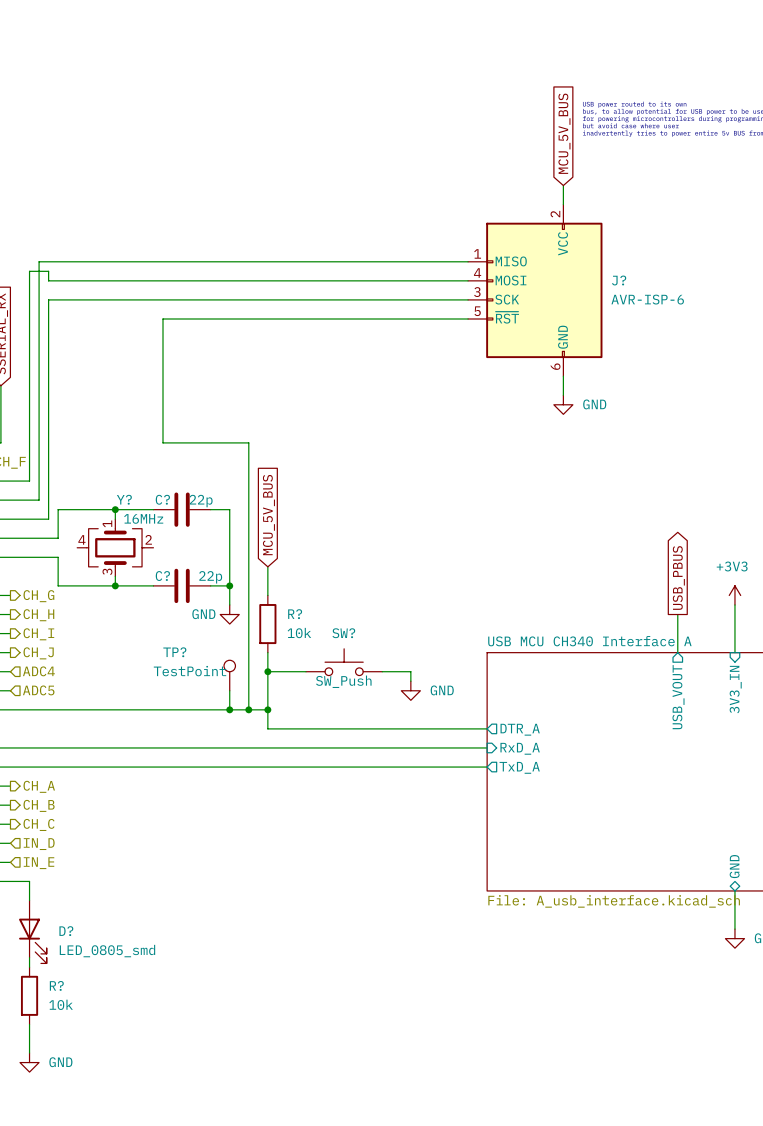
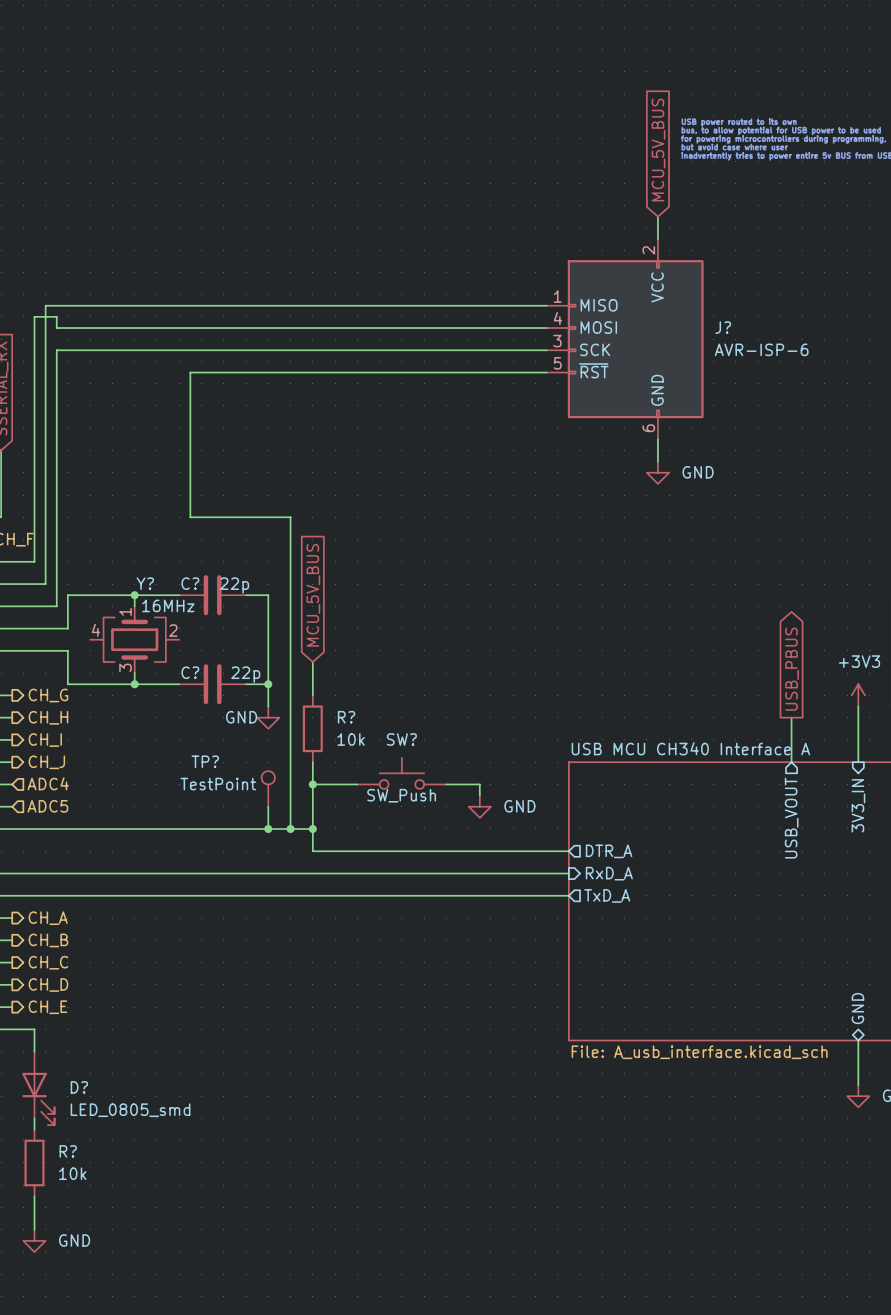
hierarchical label shape: input (39, 844) -> output (48, 984)
hierarchical label: IN_D (39, 844) -> CH_D (48, 984)
hierarchical label shape: input (38, 863) -> output (47, 1007)
hierarchical label: IN_E (38, 863) -> CH_E (47, 1007)

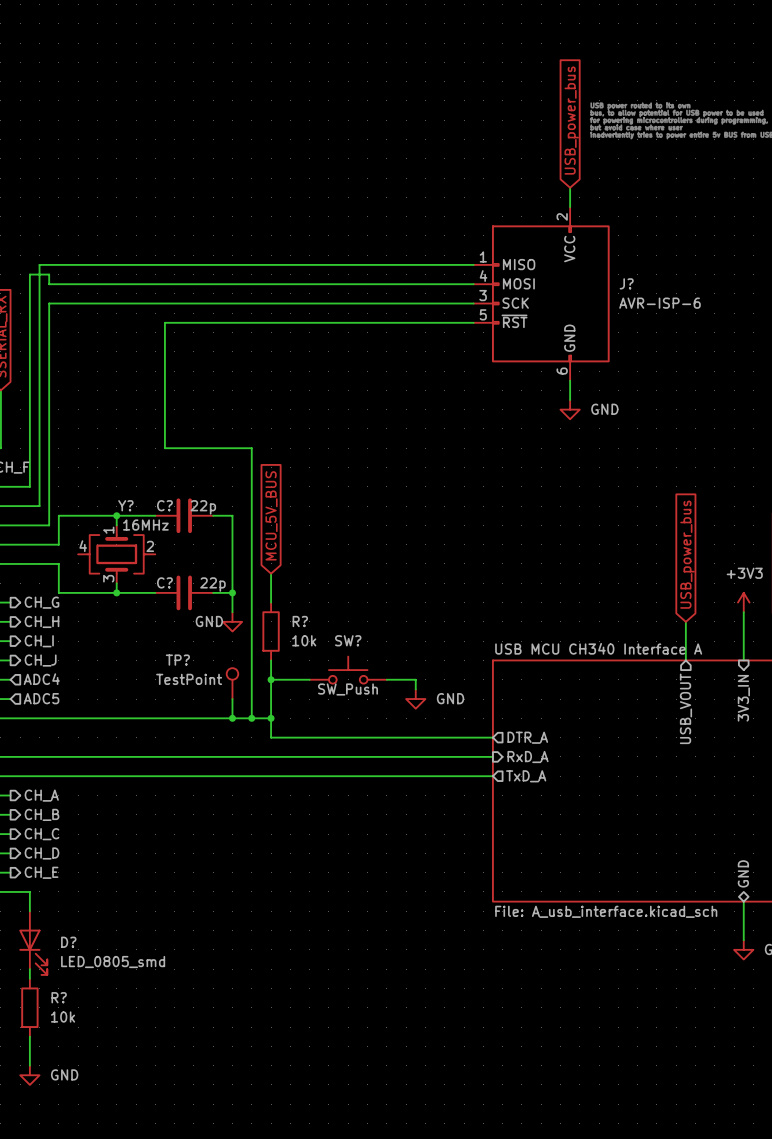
global label: MCU_5V_BUS (658, 149) -> USB_power_bus (571, 120)
global label shape: output (792, 669) -> input (687, 554)
global label: USB_PBUS (792, 669) -> USB_power_bus (687, 554)

